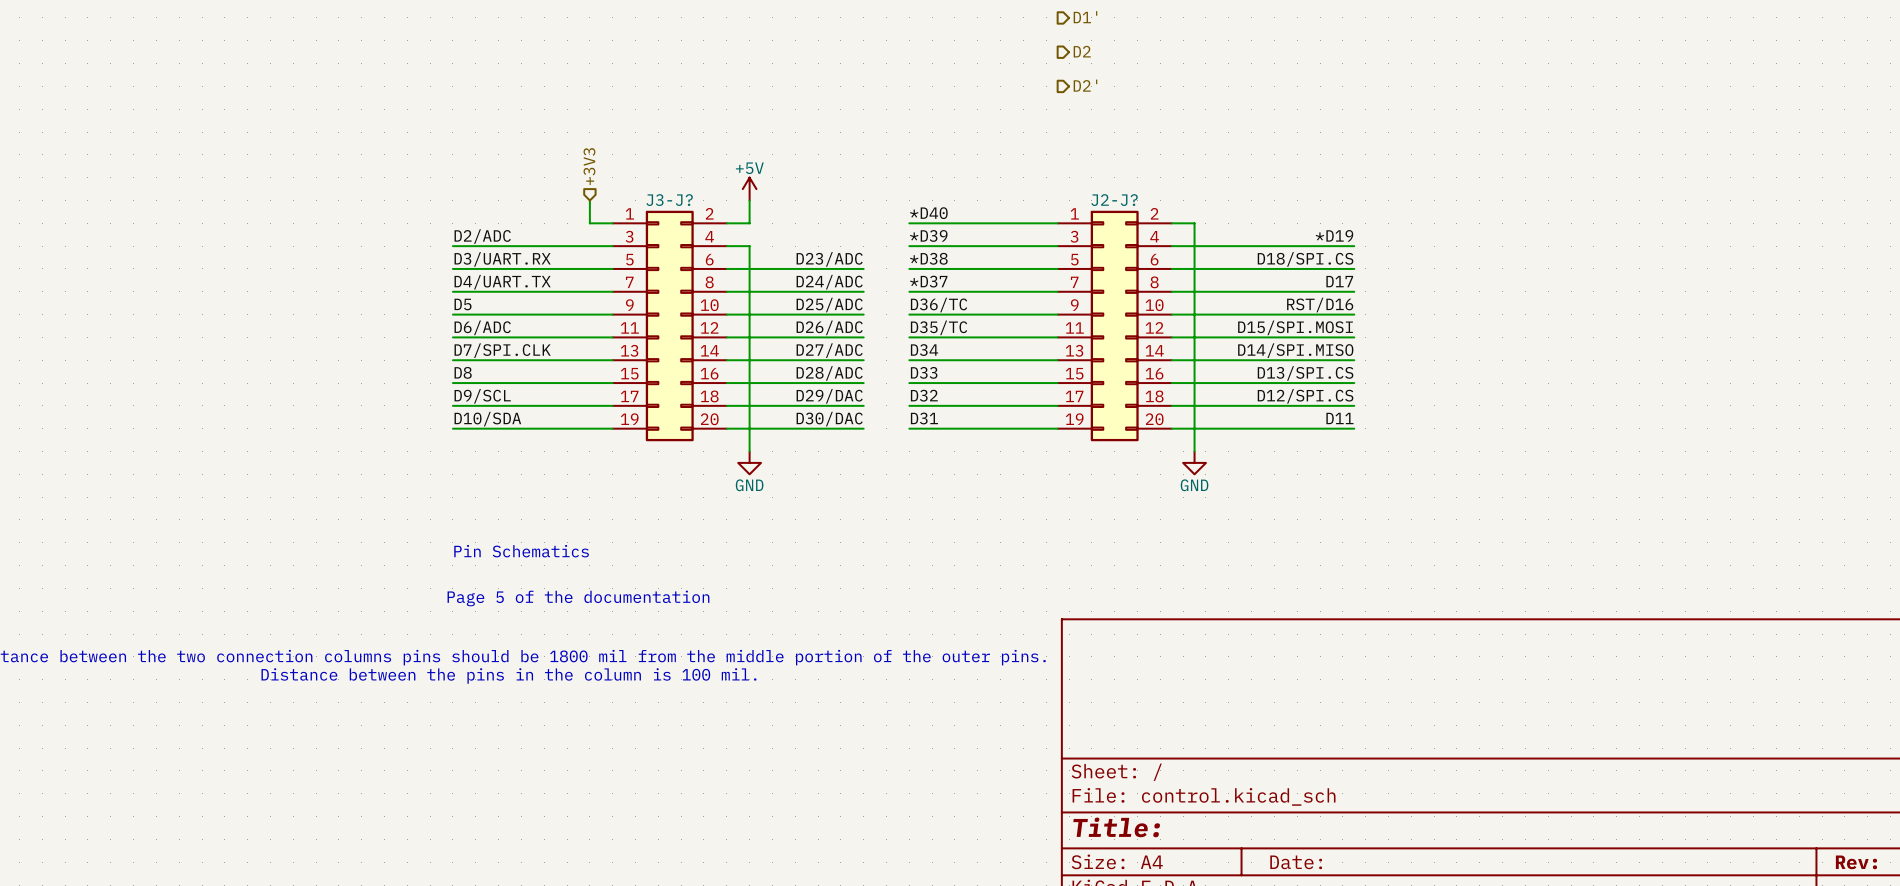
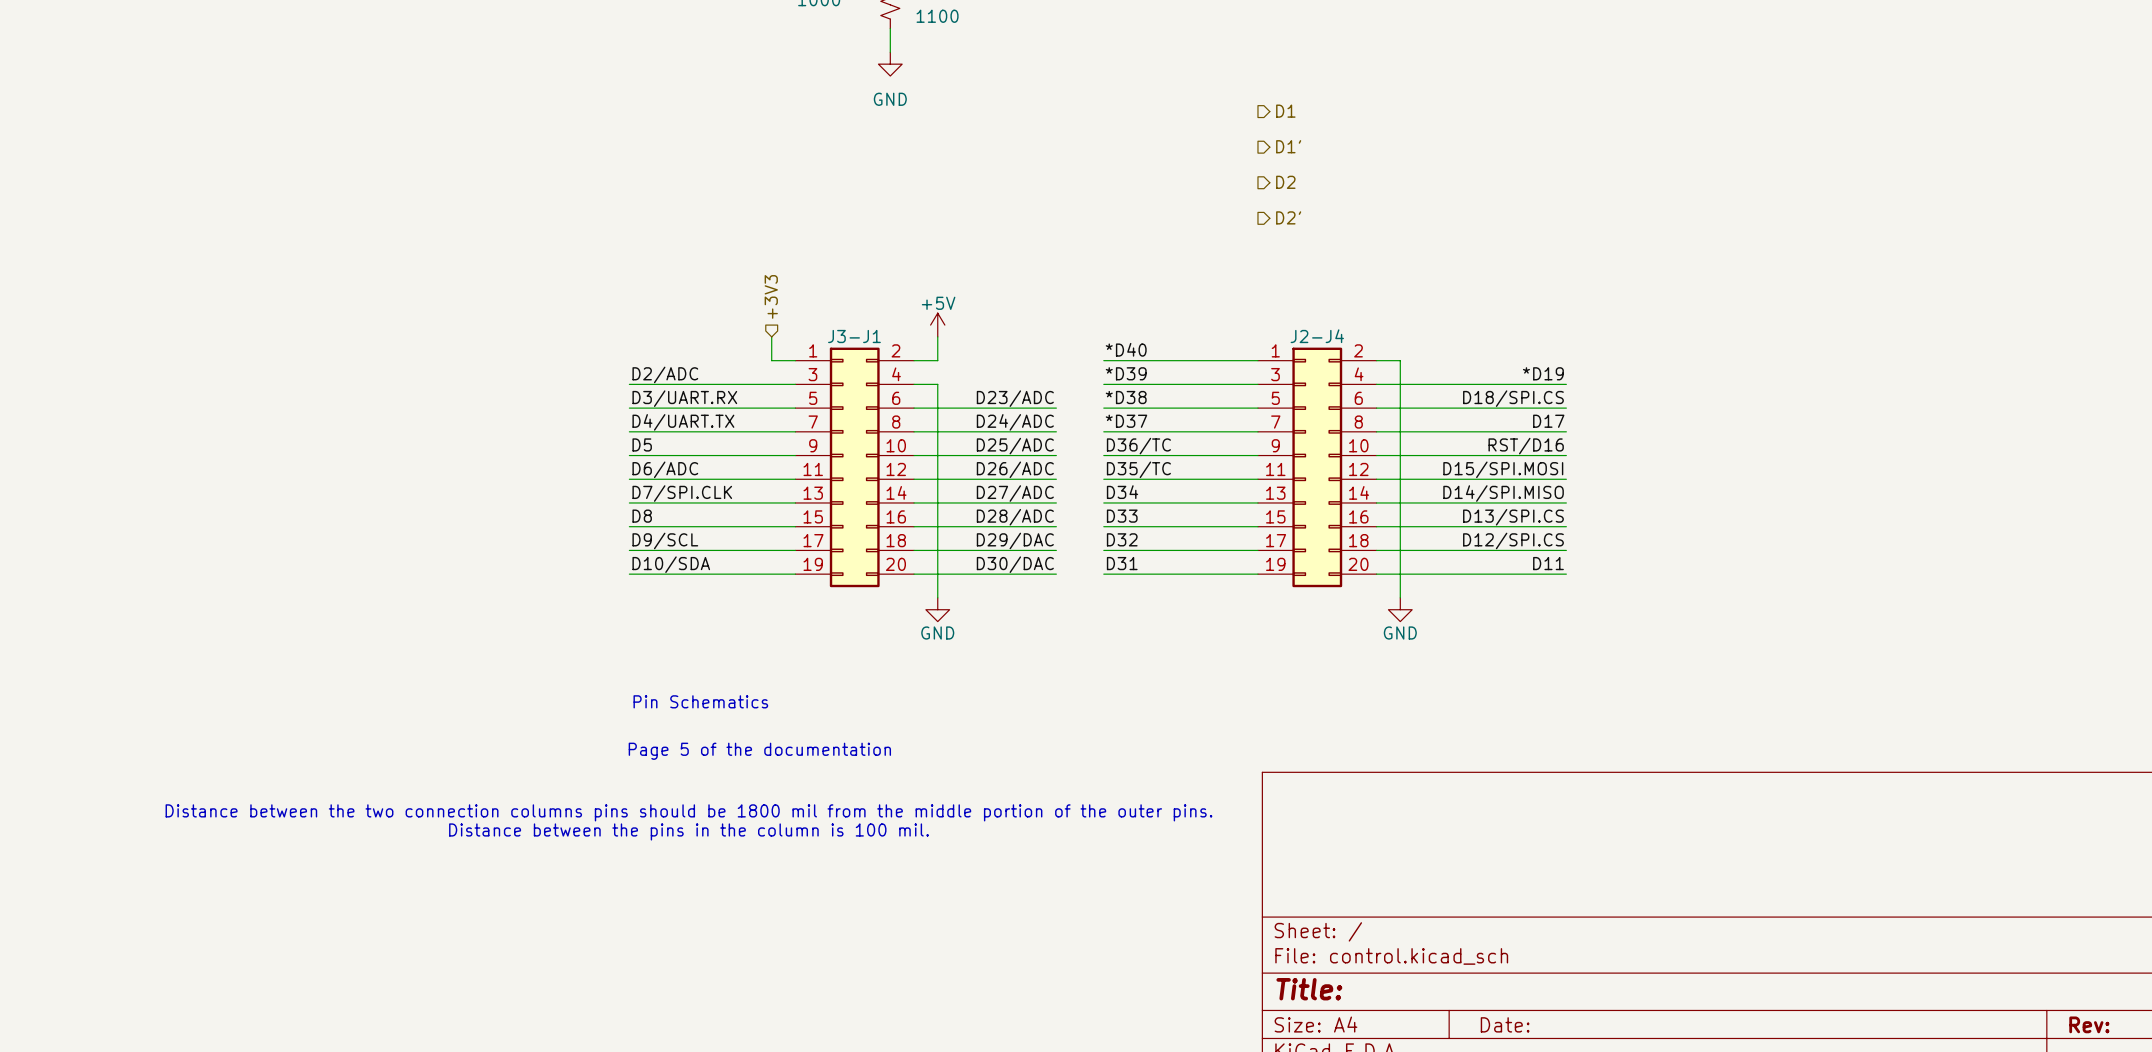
J3-J? name: J3-J? (669, 200) -> J3-J1 (854, 336)
J2-J? name: J2-J? (1114, 200) -> J2-J4 (1317, 336)

